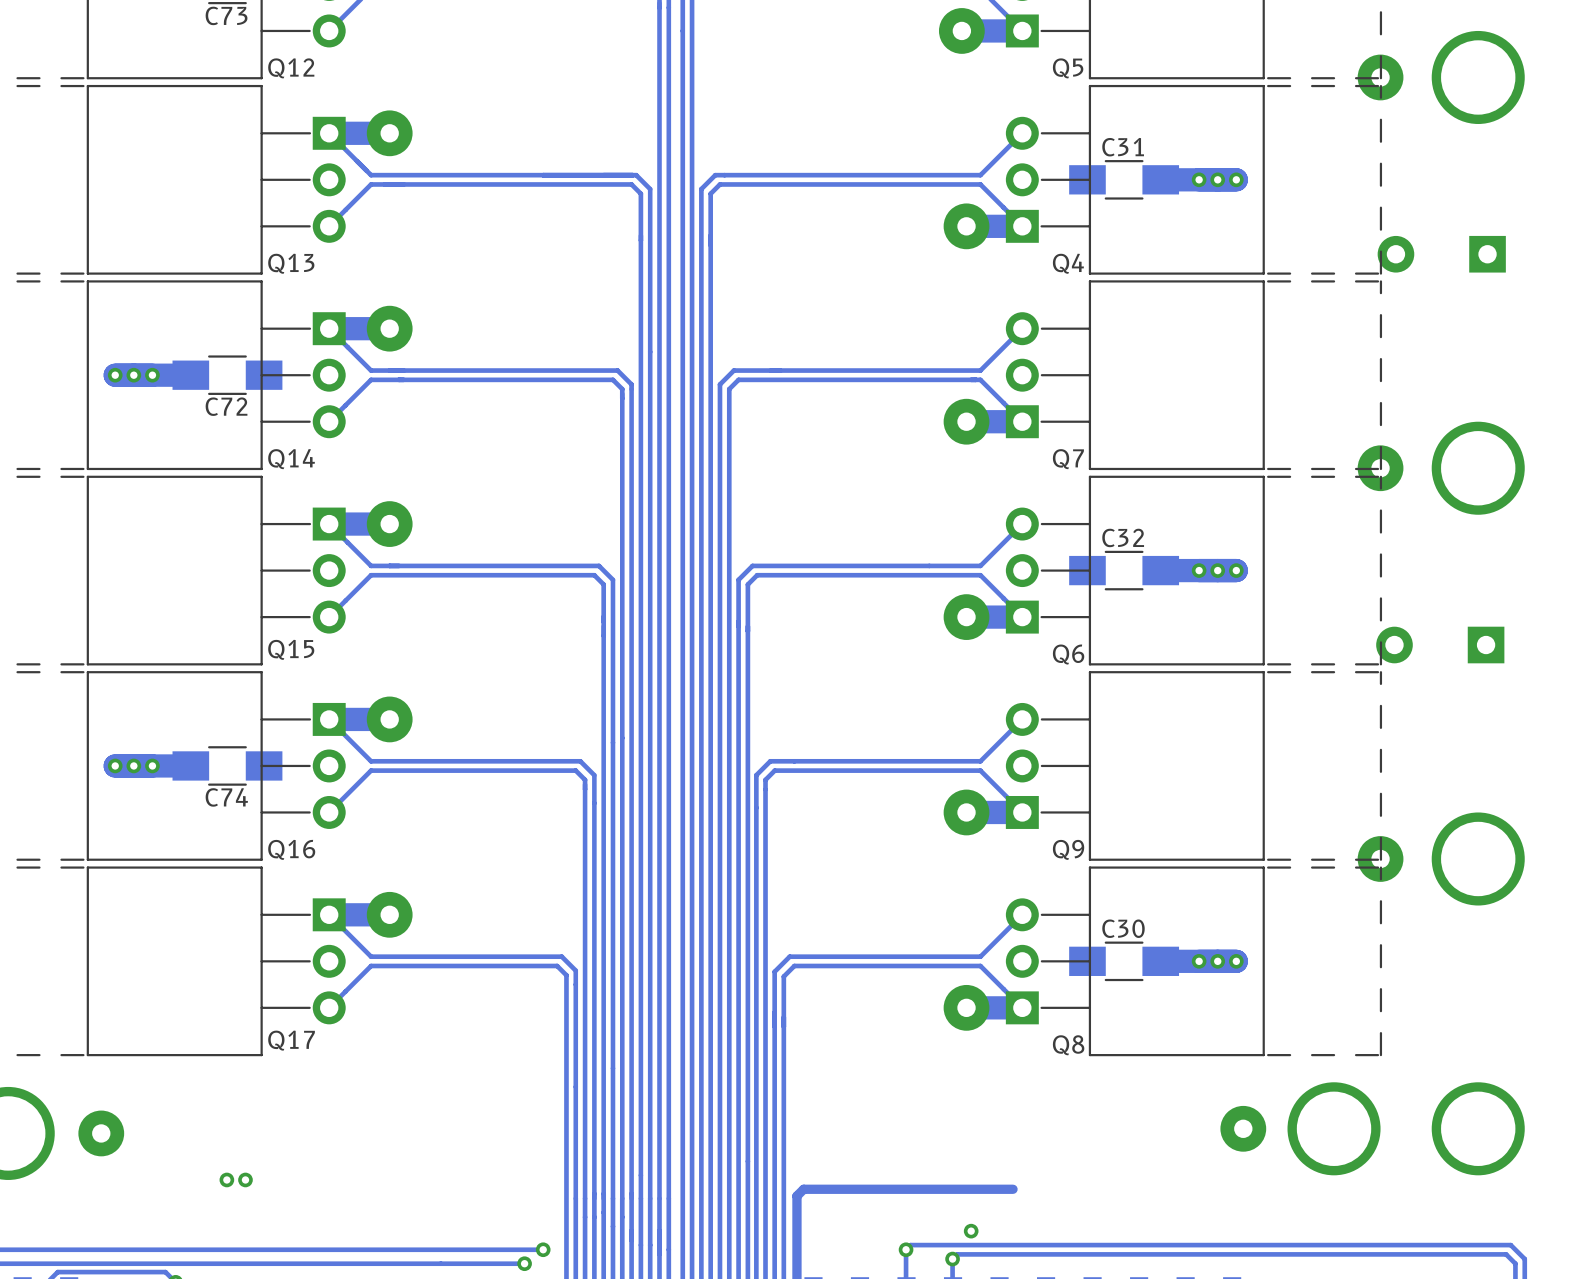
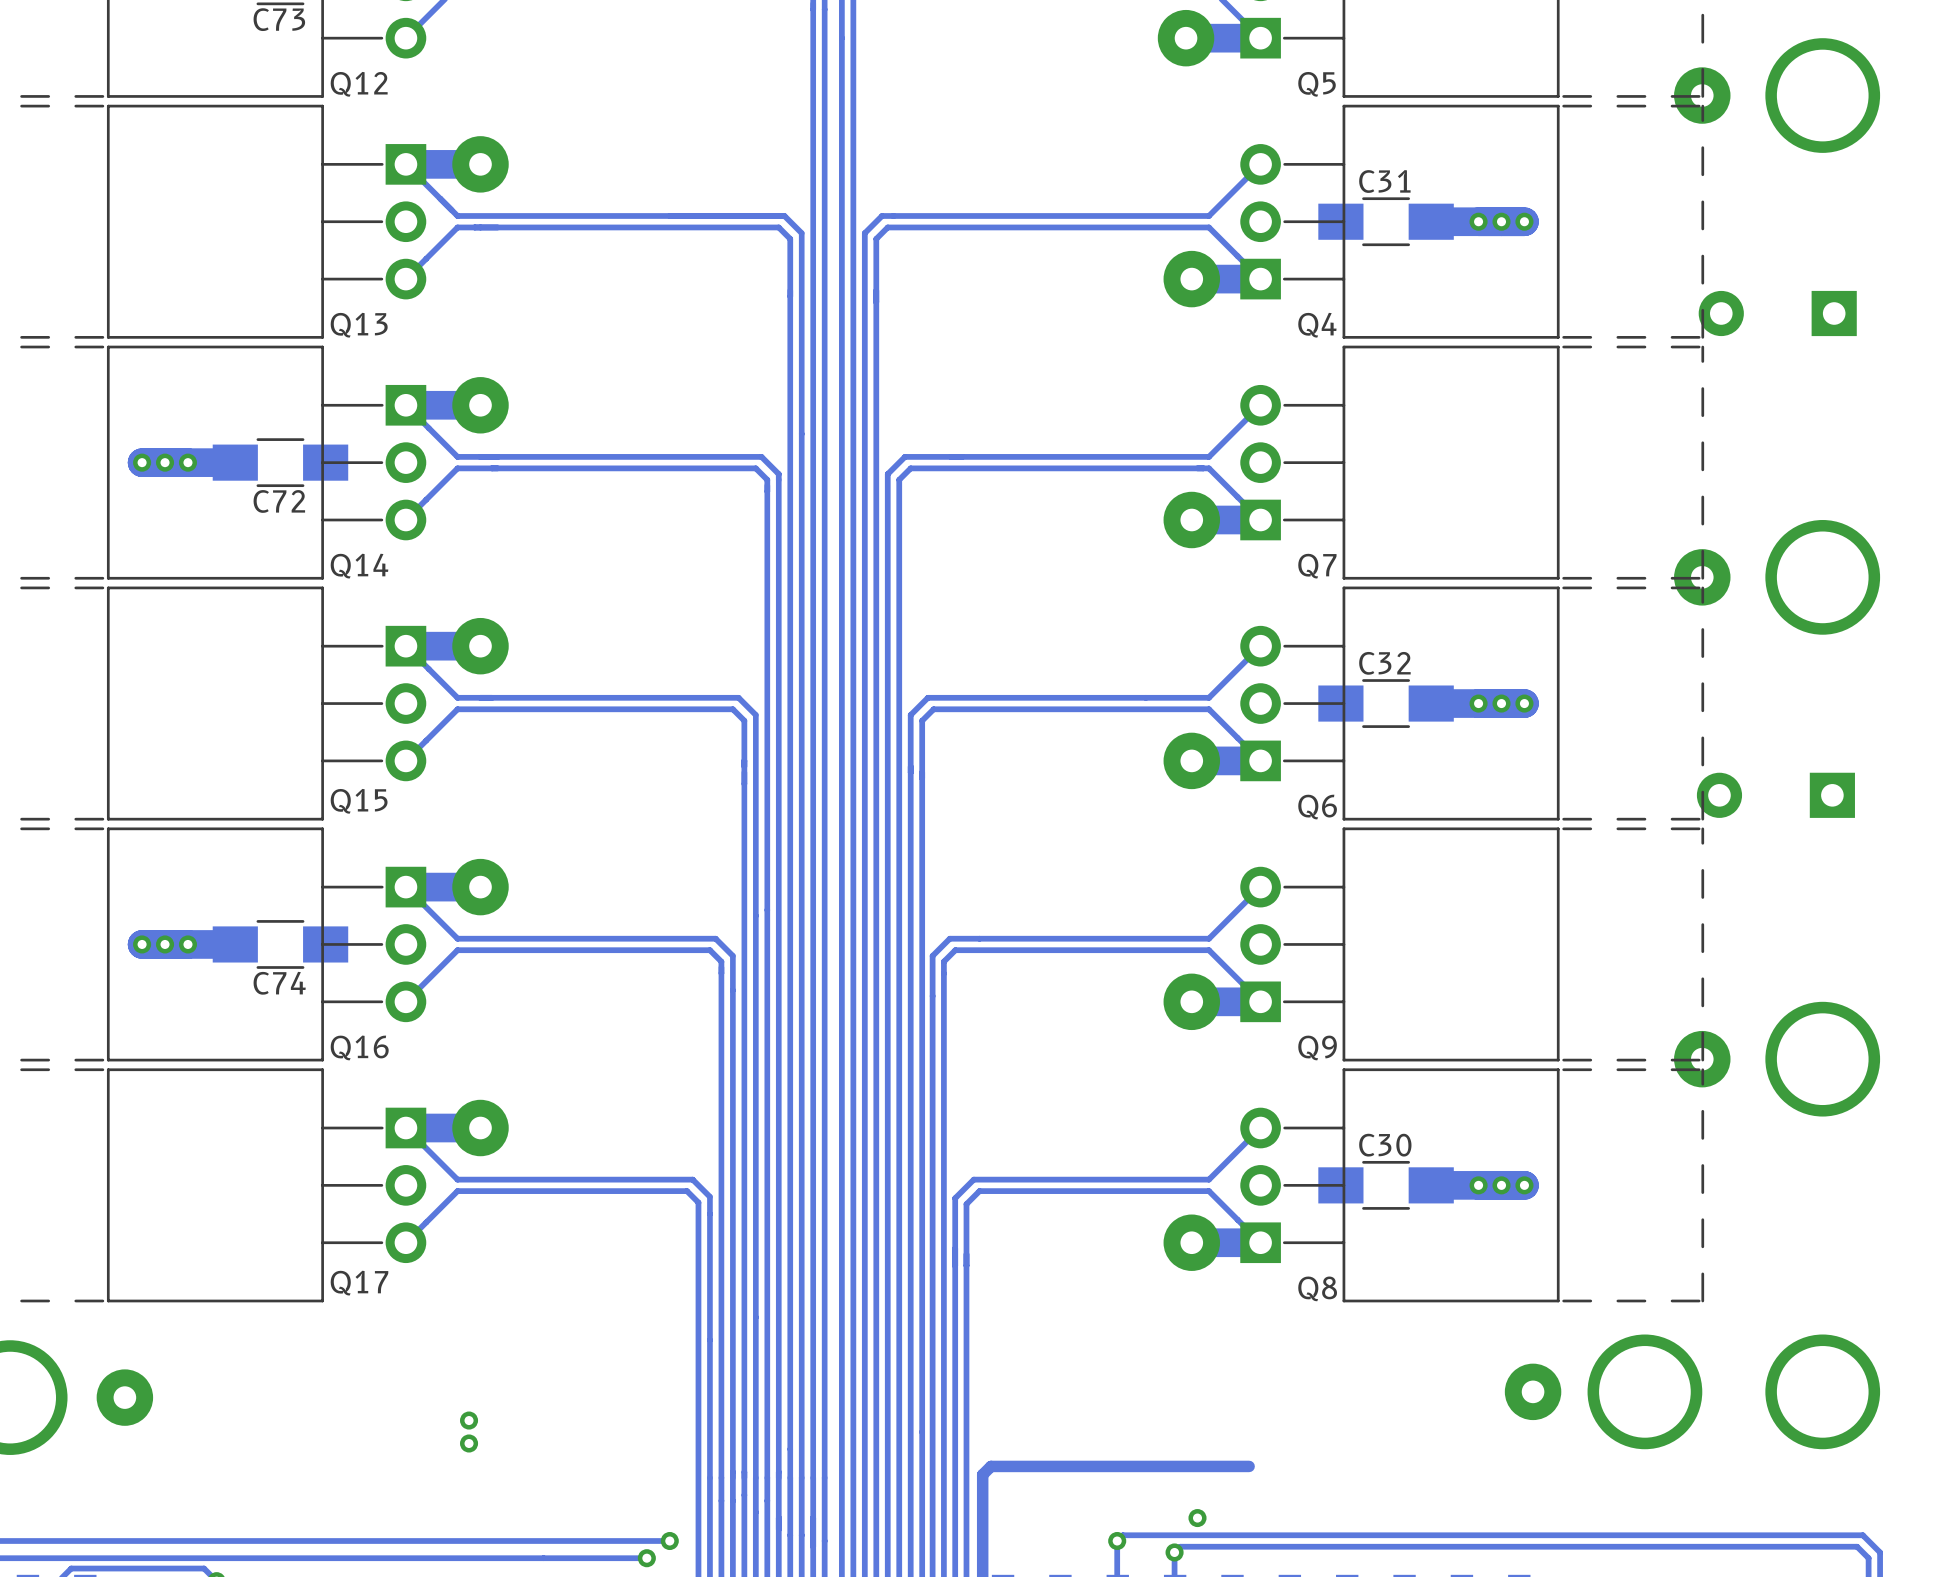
via: none -> (469, 1420)
via: none -> (469, 1443)
via: (226, 1179) -> none
via: (245, 1179) -> none

